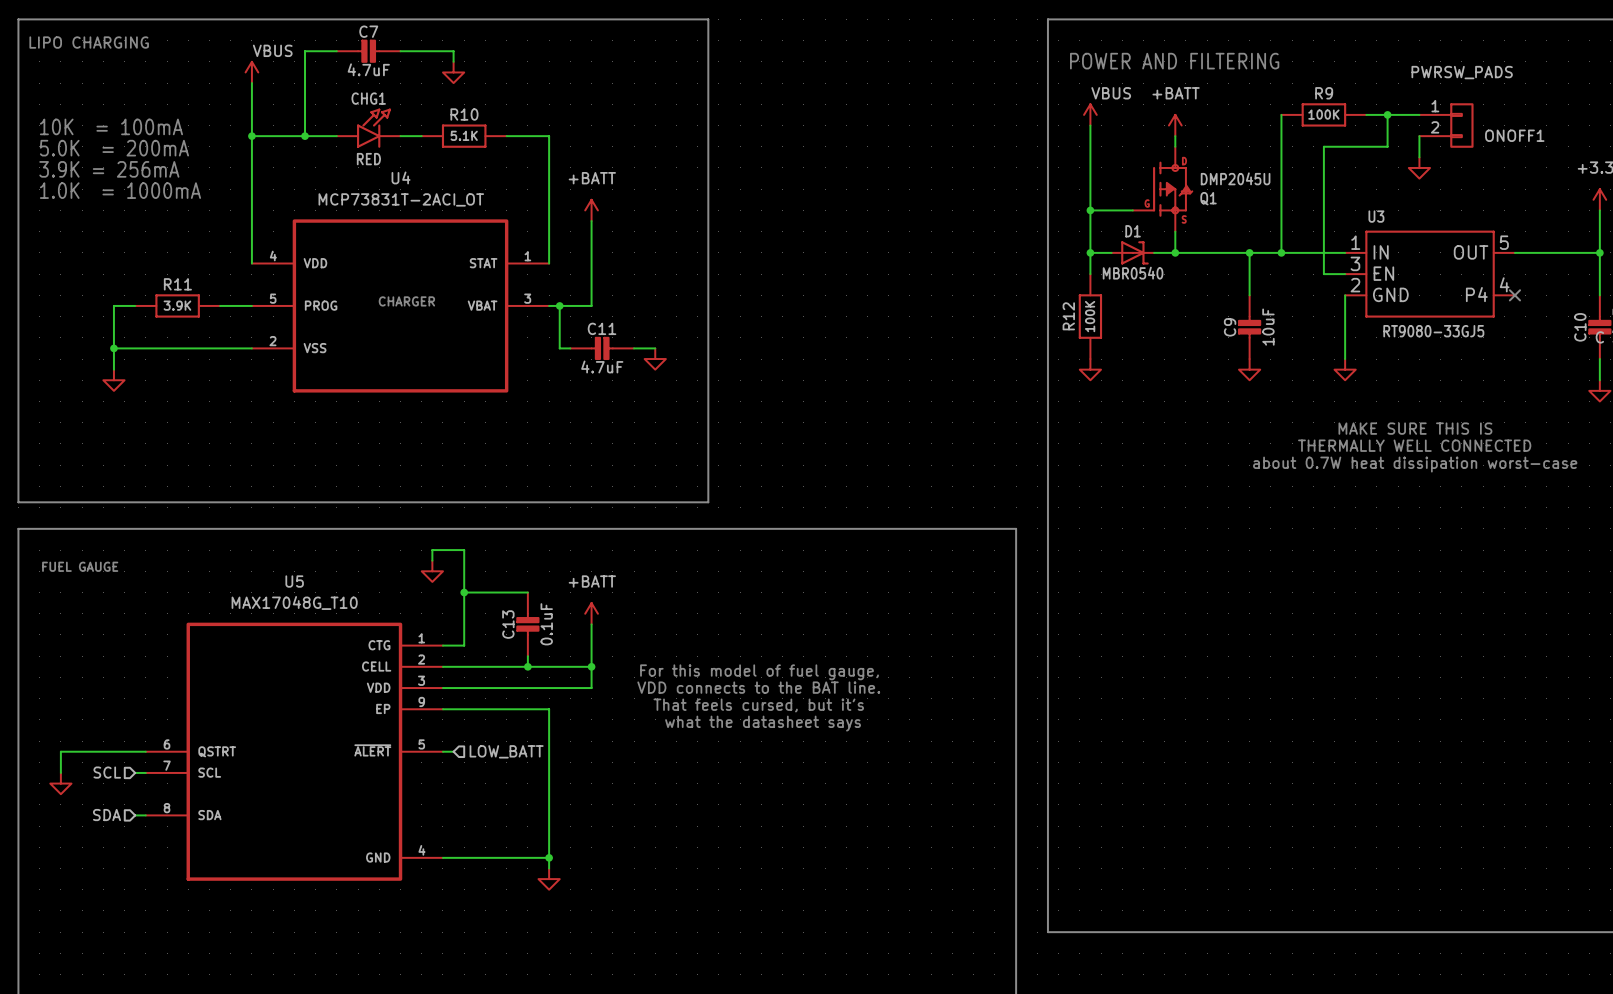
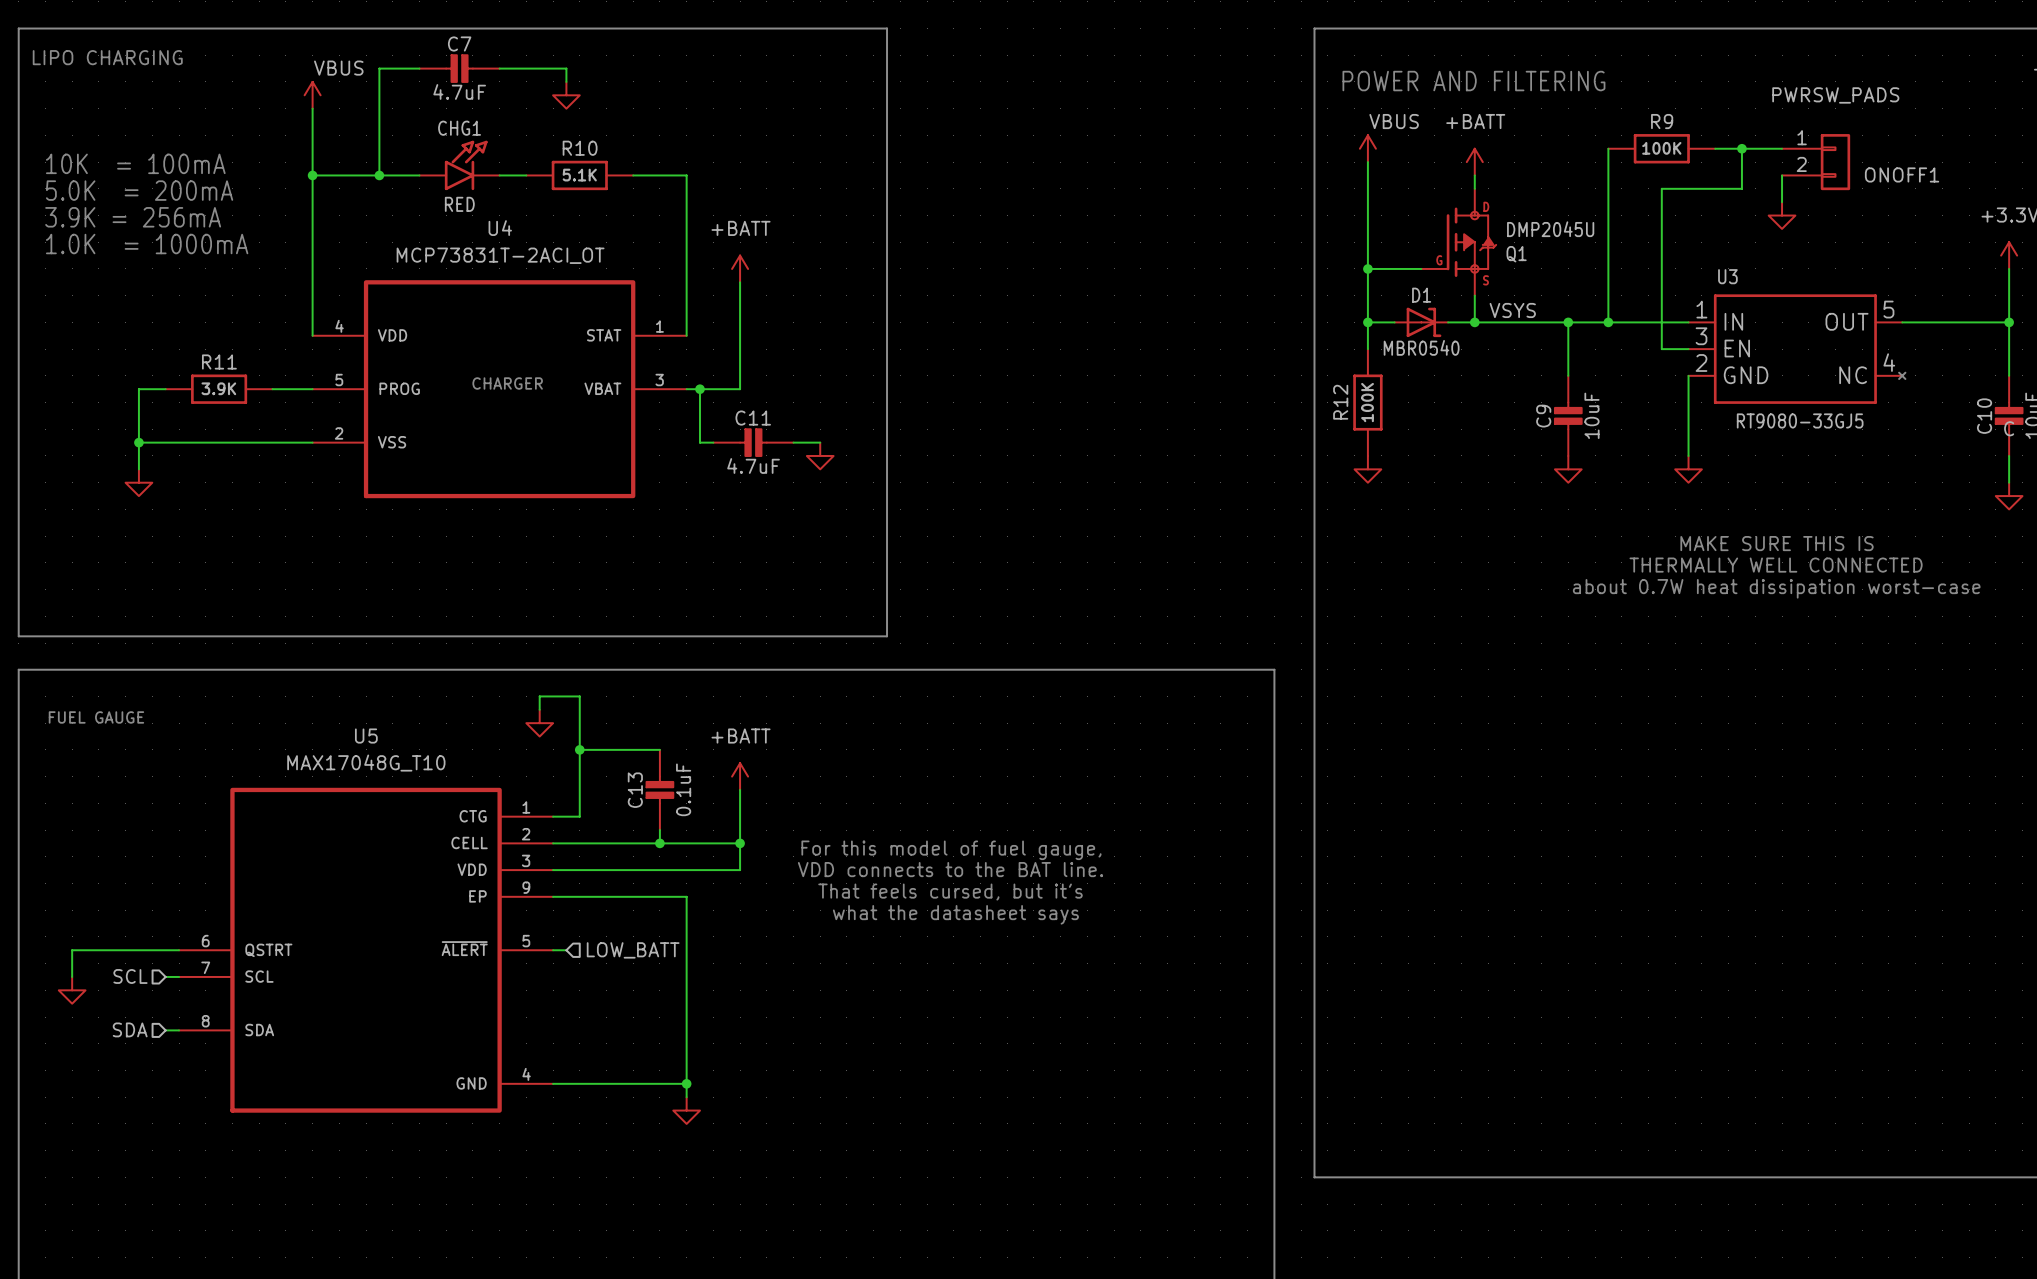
U3 symbol: [1345, 230, 1515, 318] -> [1688, 294, 1906, 404]
label: none -> VSYS (1512, 310)
no-connect mark: (1514, 295) -> none

